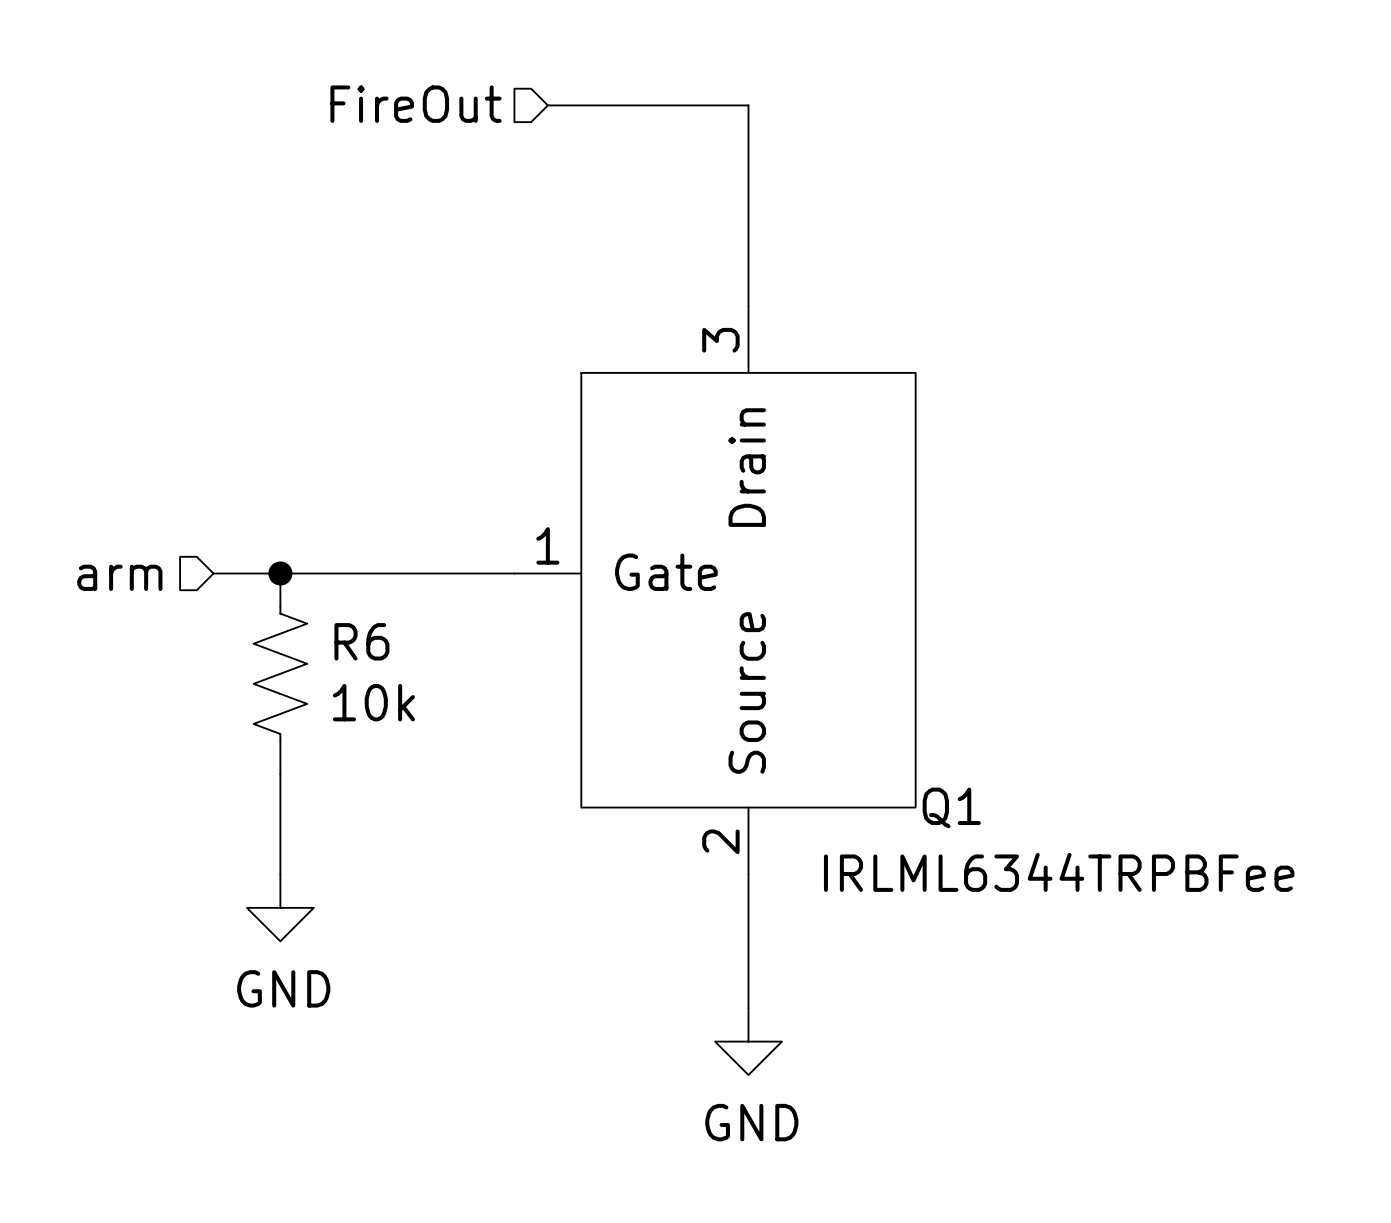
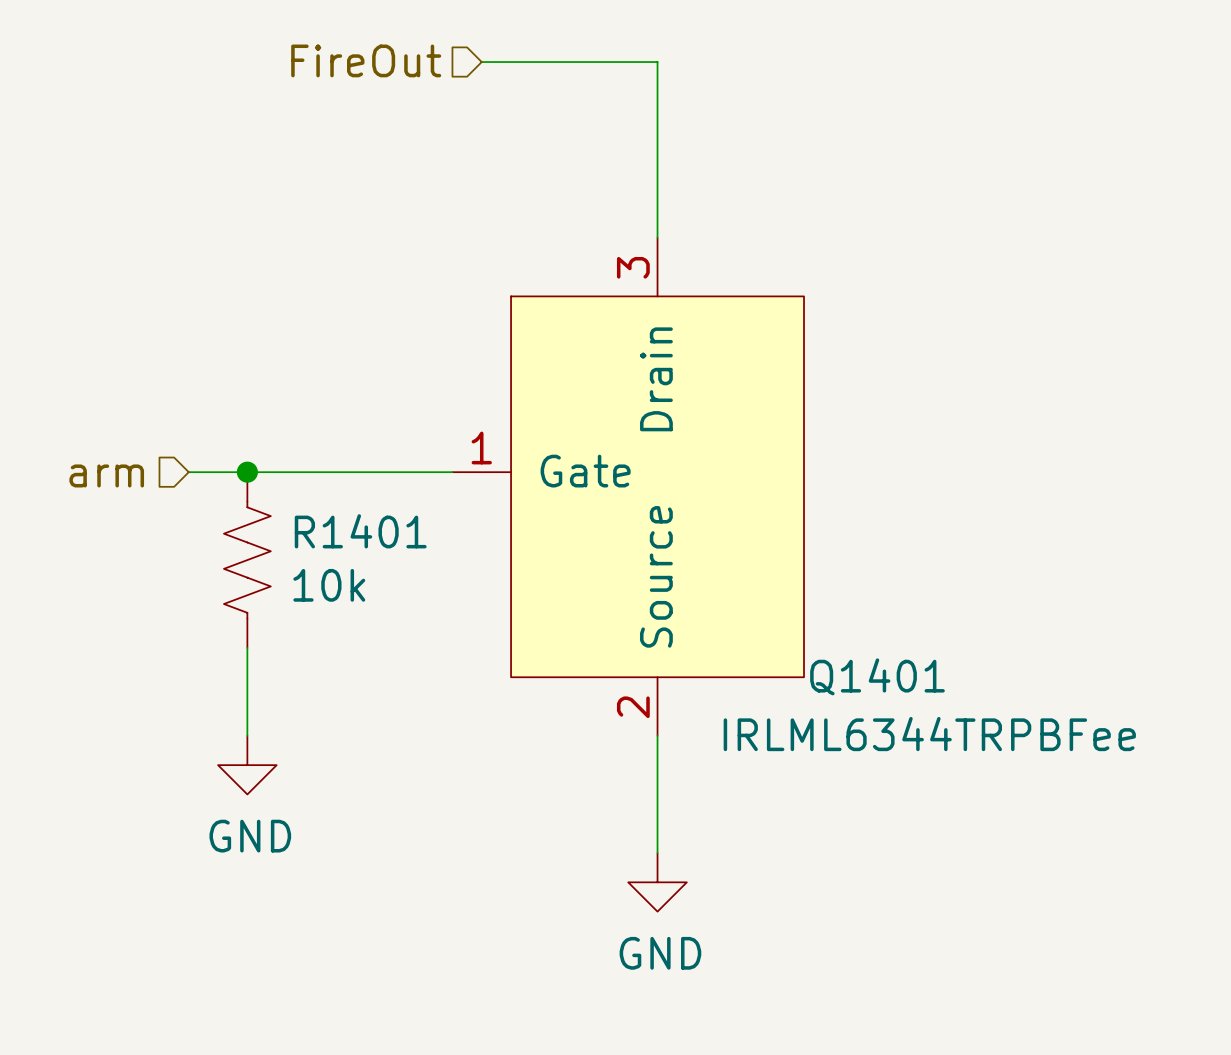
R6 name: R6 (361, 641) -> R1401 (360, 531)
Q1 name: Q1 (951, 807) -> Q1401 (877, 676)

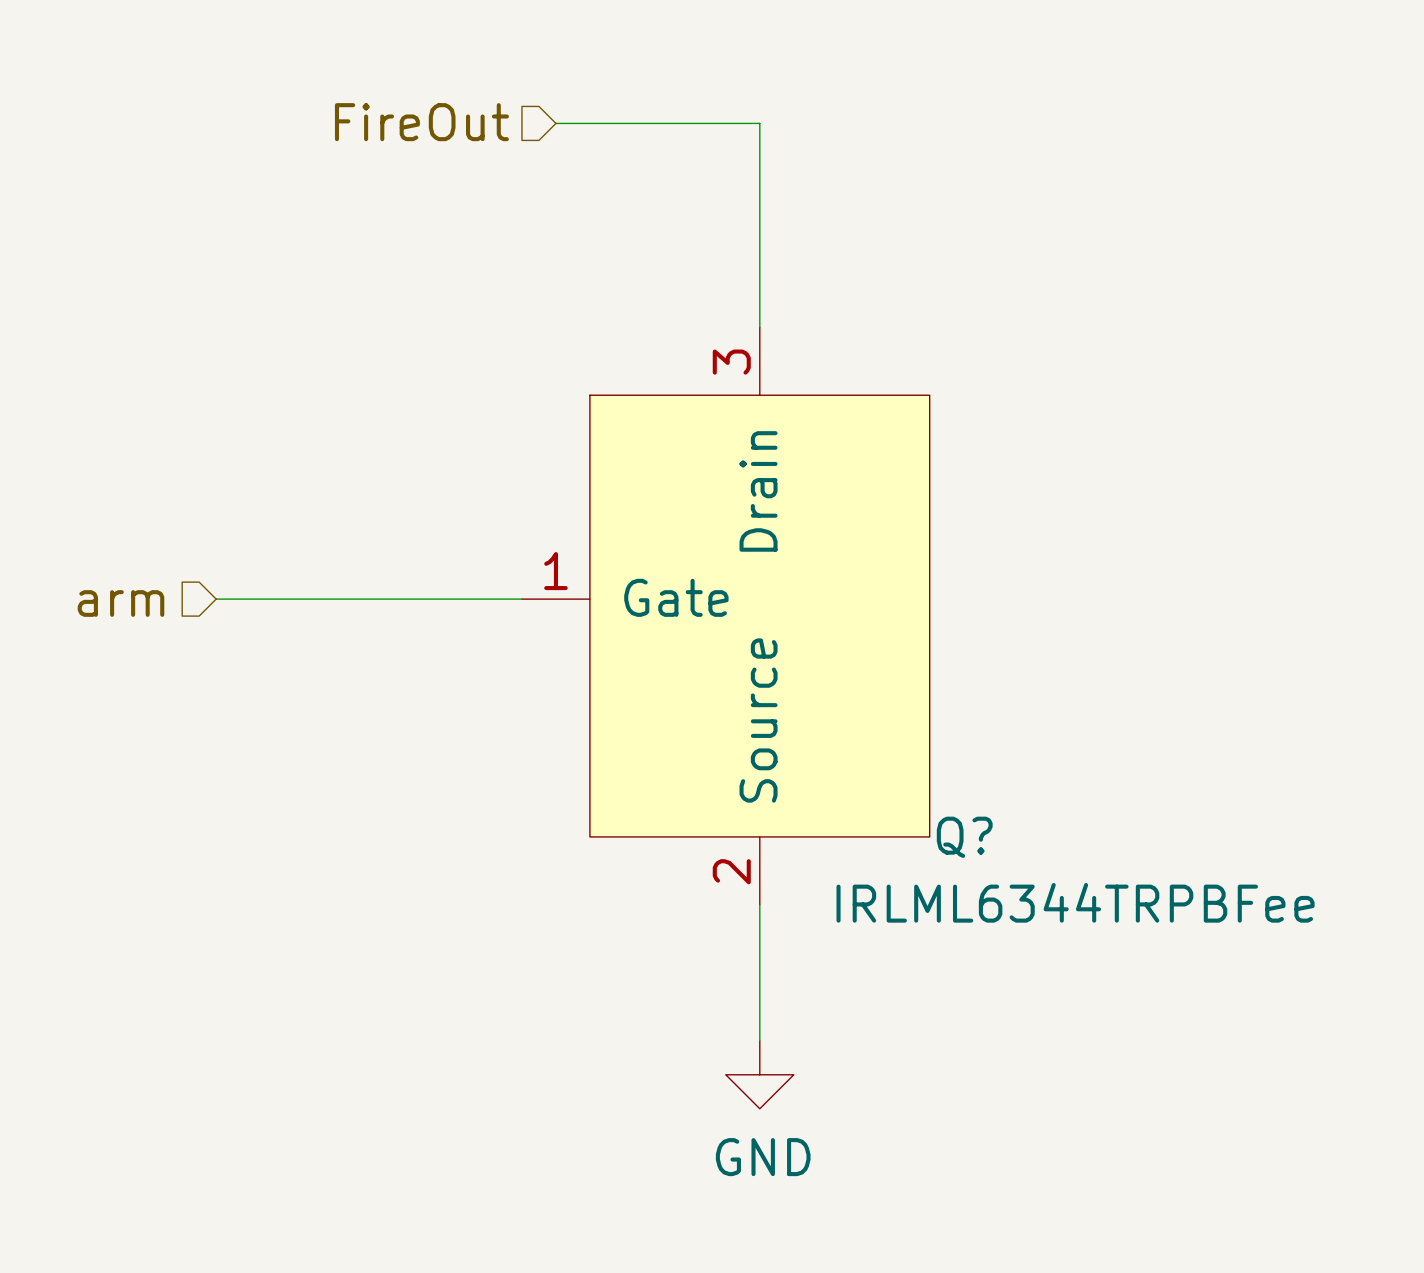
junction: (247, 472) -> none
R1401: 10k (247, 560) -> none
wire: (247, 647) (247, 735) -> none
Q1401 name: Q1401 (877, 676) -> Q? (964, 837)
power symbol: GND (247, 765) -> none

